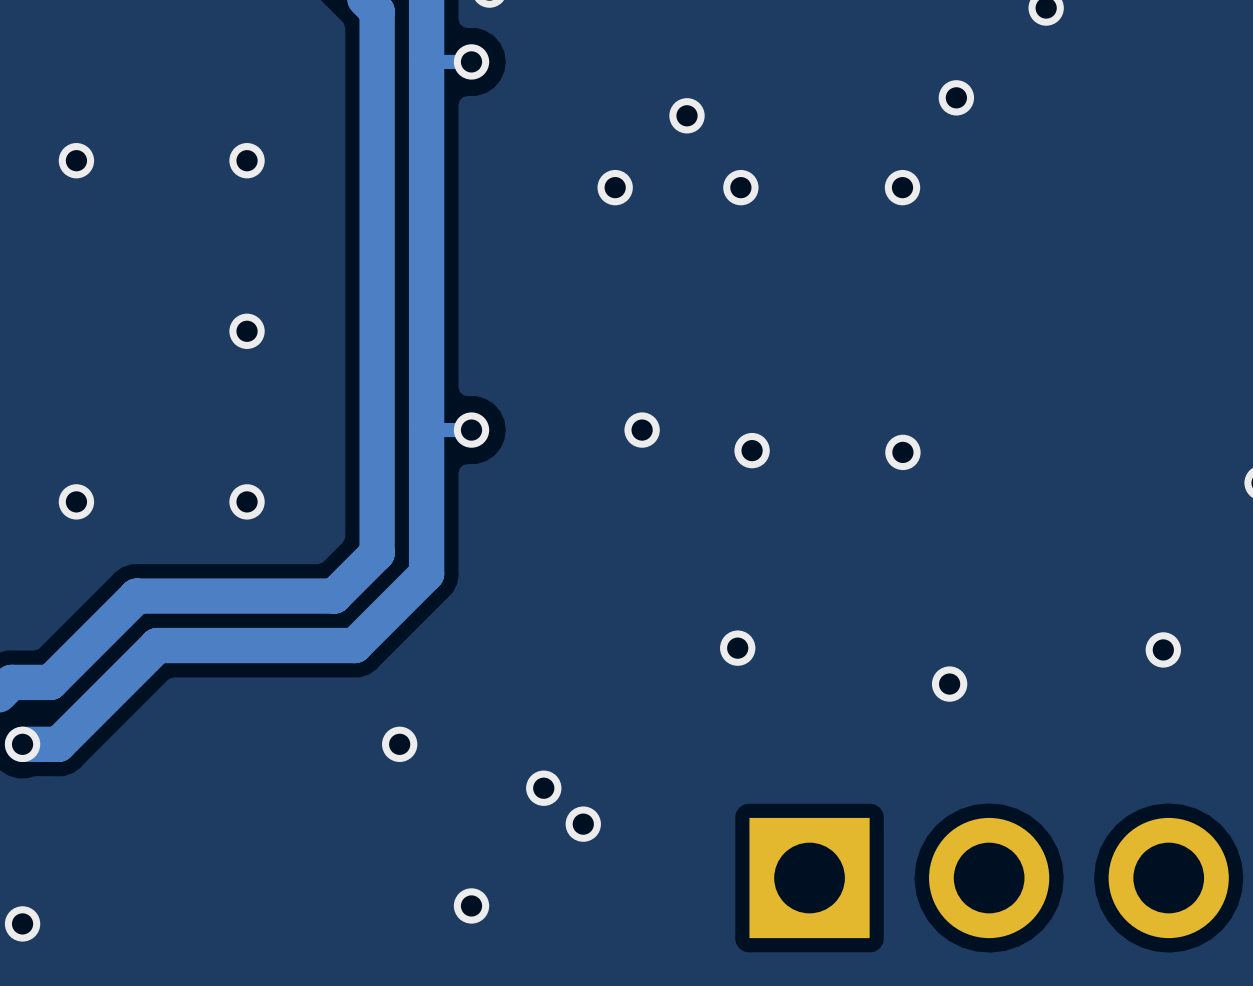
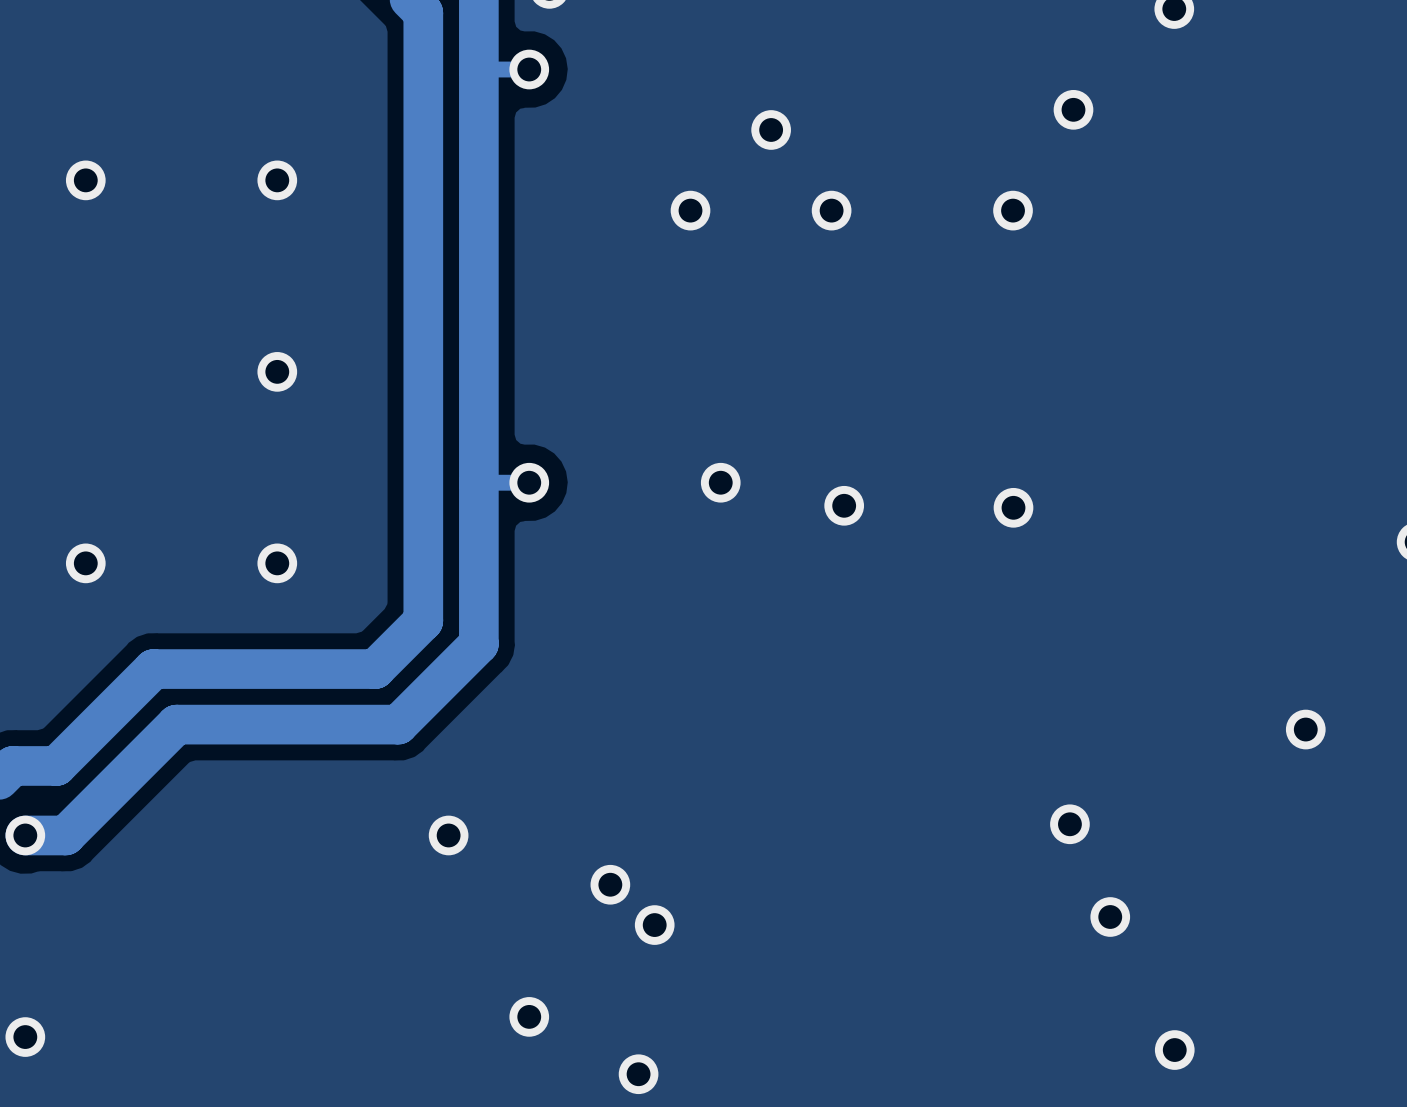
via: (737, 648) -> none
via position: (949, 684) -> (1069, 824)
via: none -> (1110, 917)
part: (989, 878) -> none
via: none -> (1174, 1050)
via: none -> (638, 1074)

